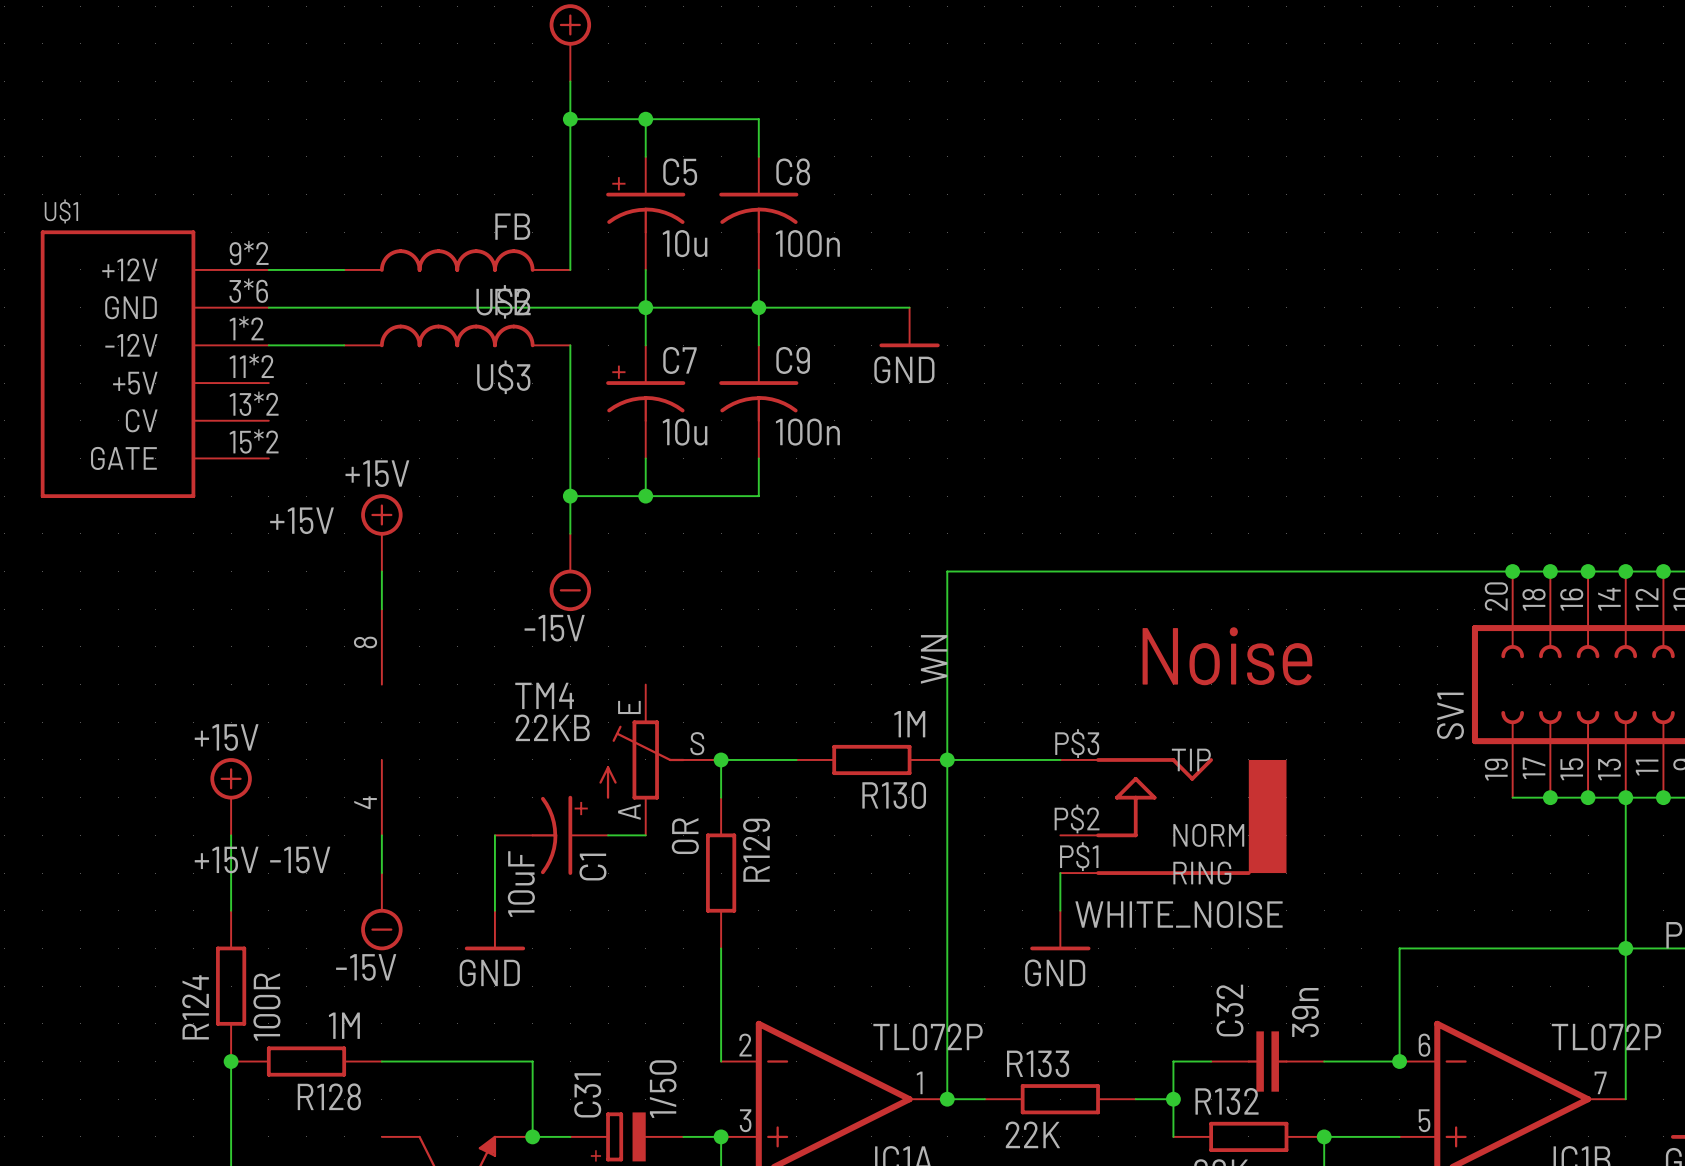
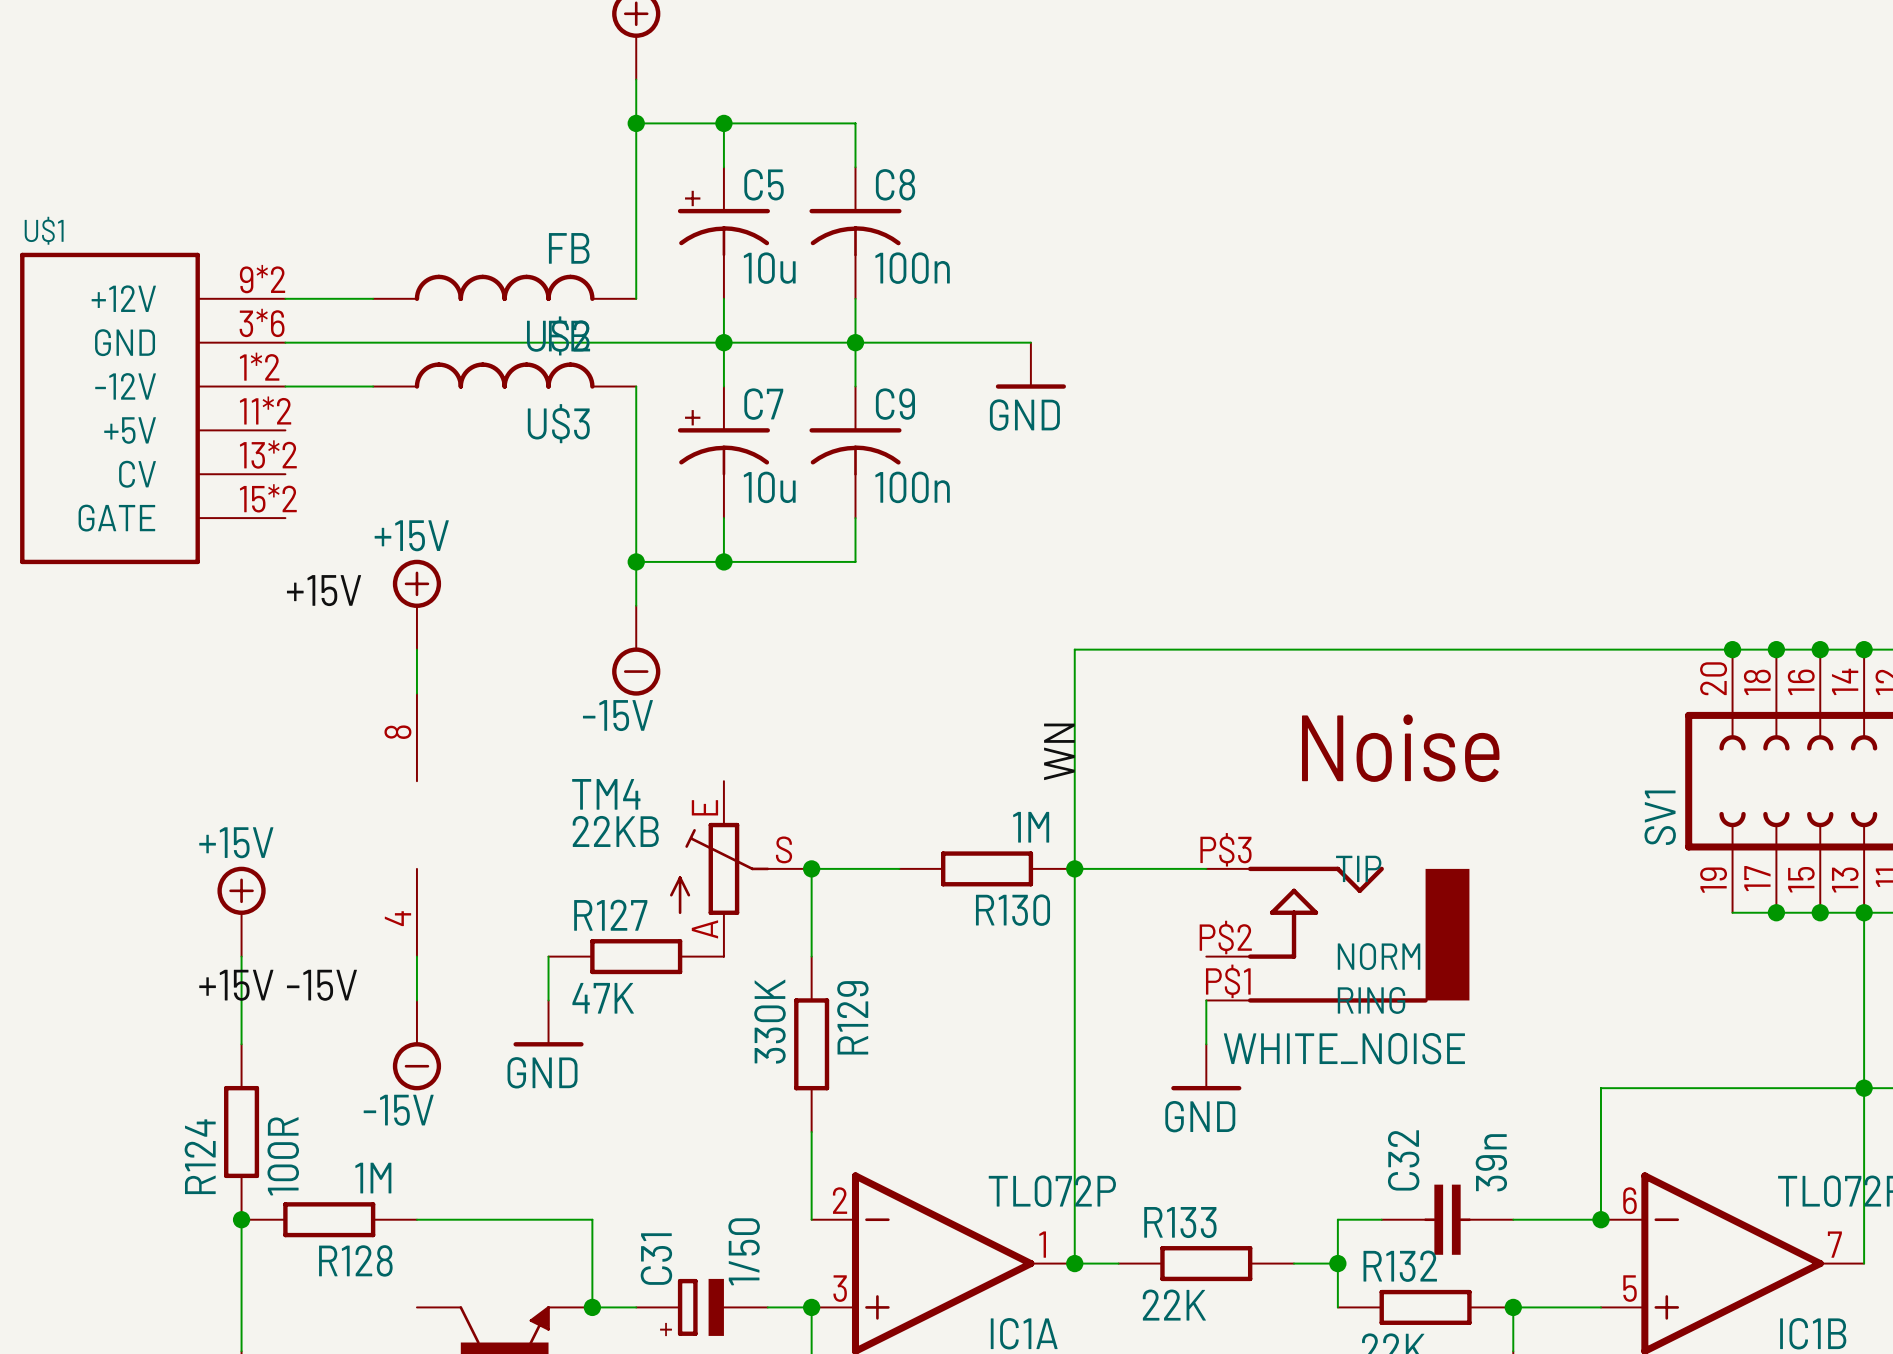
C1: 10uF (551, 835) -> none
R127: none -> 47K (636, 956)
R129 value: 0R (685, 836) -> 330K (770, 1021)
R129 position: (721, 873) -> (811, 1044)
power symbol position: GND (494, 930) -> GND (548, 1023)

